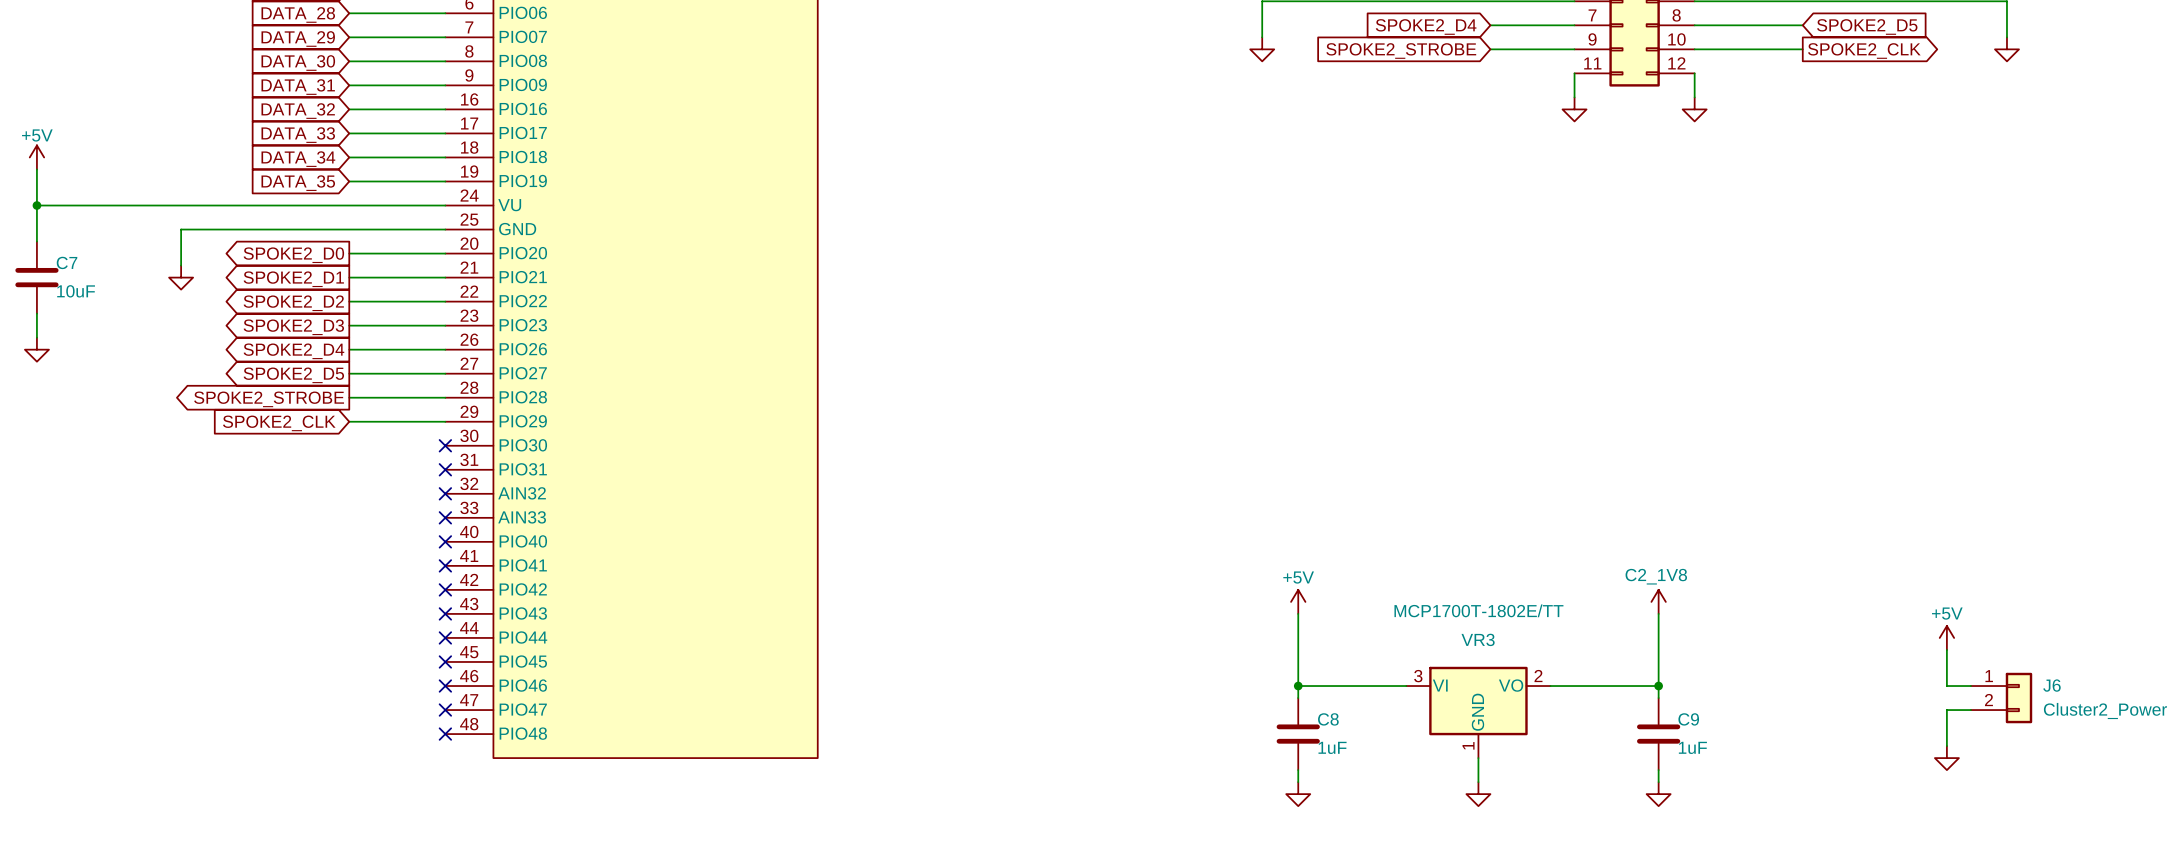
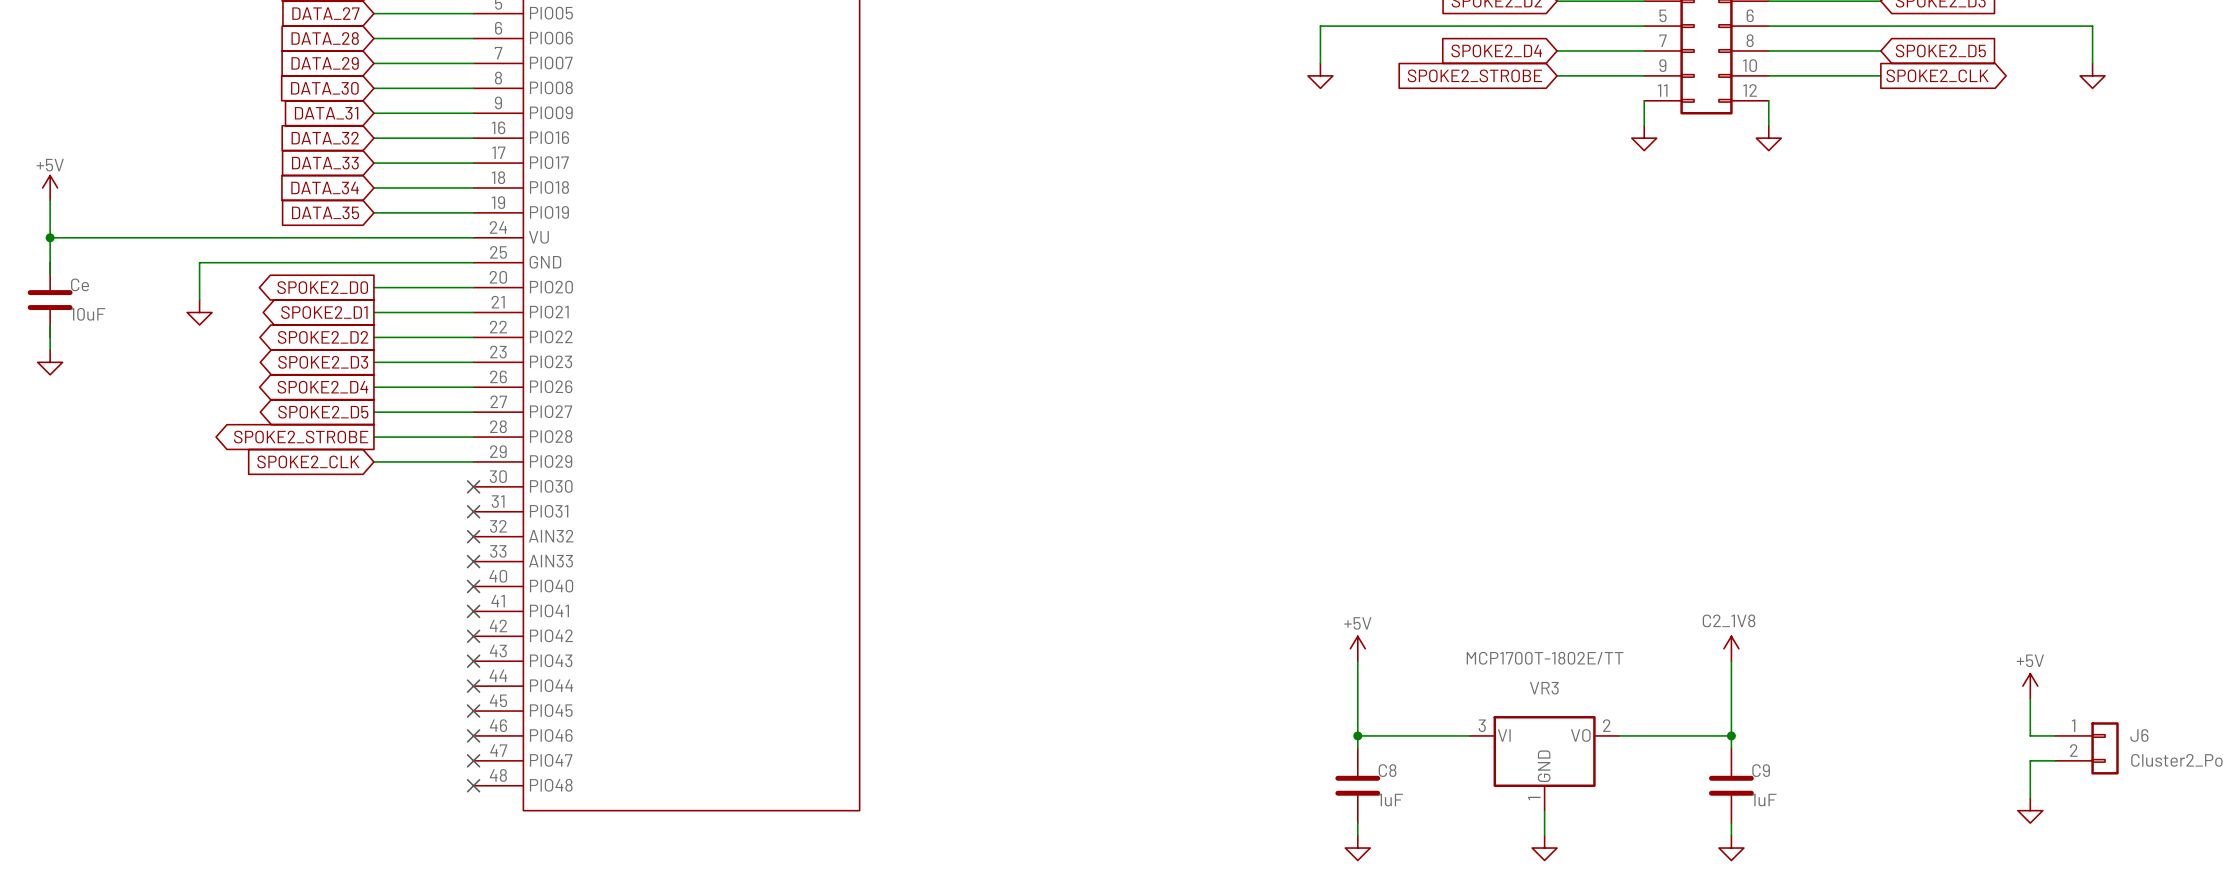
Ce: none -> 10uF (50, 300)
C7: 10uF (36, 277) -> none
power symbol position: (36, 349) -> (50, 362)

